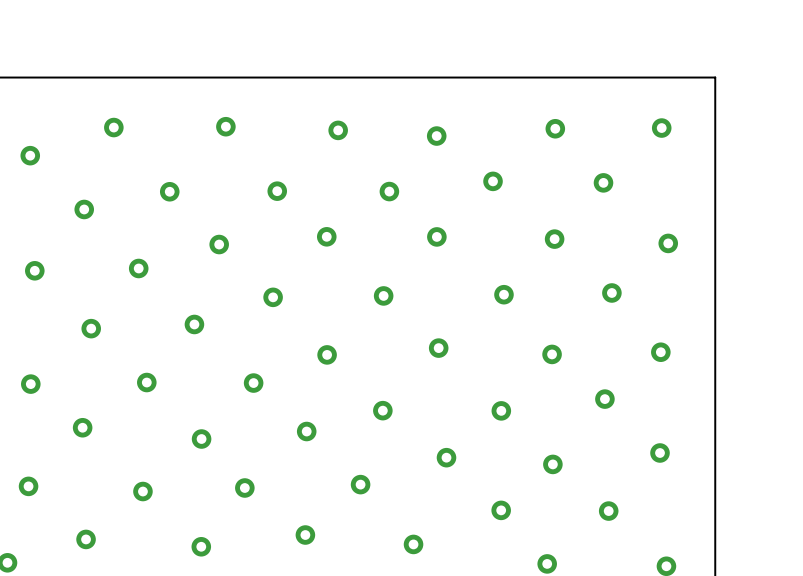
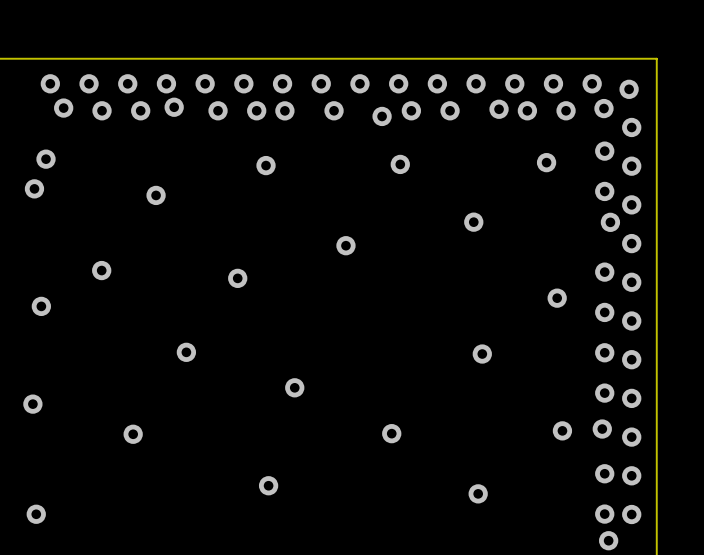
via: none -> (50, 83)
via: none -> (89, 83)
via: none -> (127, 83)
via: none -> (166, 83)
via: none -> (205, 83)
via: none -> (243, 83)
via: none -> (282, 83)
via: none -> (321, 83)
via: none -> (359, 83)
via: none -> (398, 83)
via: none -> (437, 83)
via: none -> (476, 83)
via: none -> (514, 83)
via: none -> (553, 83)
via: none -> (592, 83)
via: none -> (629, 89)
via: none -> (102, 110)
via: none -> (140, 110)
via: none -> (218, 110)
via: none -> (256, 110)
via: none -> (334, 110)
via: none -> (411, 110)
via: none -> (450, 110)
via: none -> (527, 110)
via: none -> (566, 110)
via: none -> (631, 127)
via: none -> (604, 151)
via: none -> (46, 159)
via: (493, 181) -> none
via: none -> (400, 164)
via: none -> (266, 165)
via: none -> (631, 166)
via: (169, 191) -> none
via: (277, 191) -> none
via: (389, 191) -> none
via: none -> (604, 191)
via: none -> (156, 195)
via: none -> (631, 204)
via: (326, 236) -> none
via: (436, 236) -> none
via position: (554, 239) -> (473, 222)
via: (219, 244) -> none
via: none -> (631, 243)
via: none -> (345, 245)
via: (138, 268) -> none
via: none -> (101, 270)
via: (611, 292) -> none
via: none -> (604, 272)
via: (503, 294) -> none
via: (383, 295) -> none
via position: (273, 297) -> (237, 278)
via: none -> (631, 282)
via: none -> (557, 298)
via: (194, 324) -> none
via: none -> (631, 320)
via: (438, 348) -> none
via position: (660, 352) -> (604, 312)
via: (327, 354) -> none
via: (552, 354) -> none
via: none -> (604, 352)
via: none -> (482, 354)
via: (146, 382) -> none
via: none -> (631, 359)
via position: (253, 383) -> (186, 352)
via: (604, 399) -> none
via: (382, 410) -> none
via: (501, 410) -> none
via: none -> (294, 387)
via: none -> (604, 393)
via: none -> (631, 398)
via: (306, 431) -> none
via position: (201, 439) -> (133, 434)
via: none -> (562, 430)
via: none -> (631, 437)
via: (552, 464) -> none
via: (360, 484) -> none
via: (244, 487) -> none
via: (142, 491) -> none
via: none -> (604, 473)
via: none -> (631, 475)
via: none -> (268, 485)
via: (501, 510) -> none
via: (608, 511) -> none
via: none -> (478, 493)
via: (305, 535) -> none
via: none -> (604, 514)
via: none -> (631, 514)
via: (413, 544) -> none
via: (201, 546) -> none
via: (547, 563) -> none

